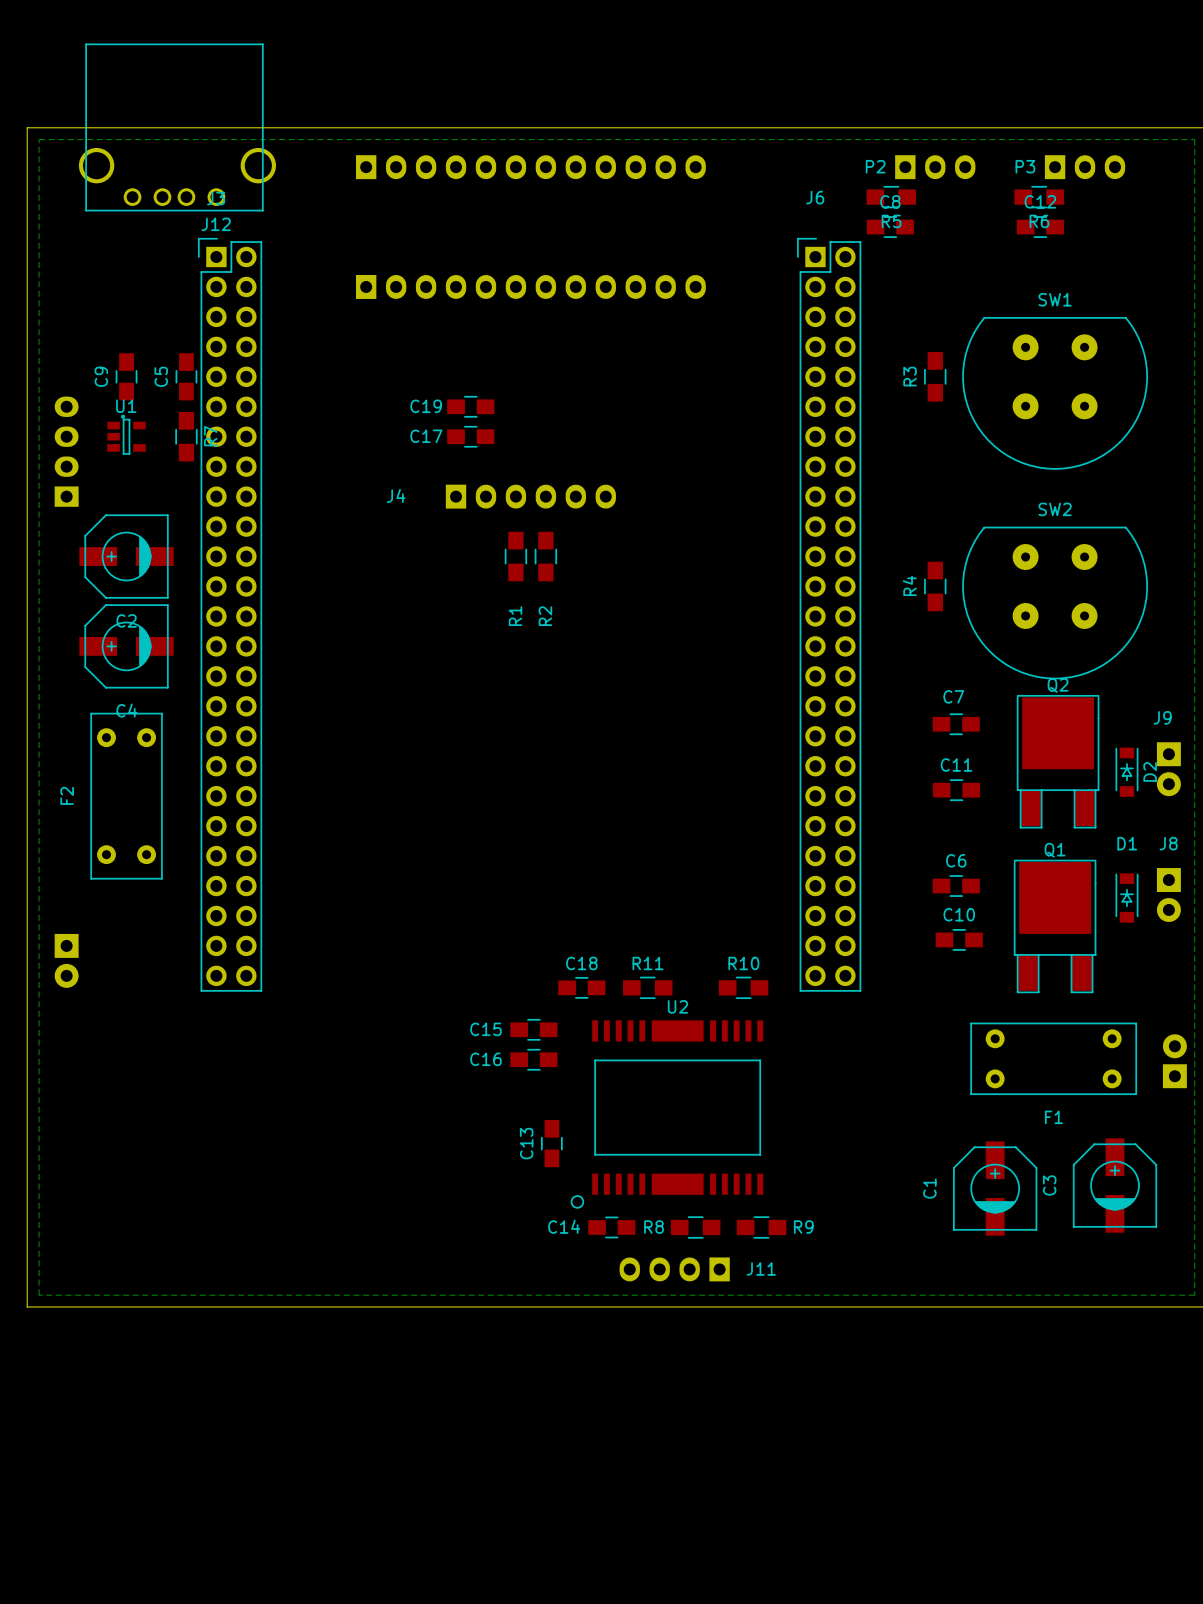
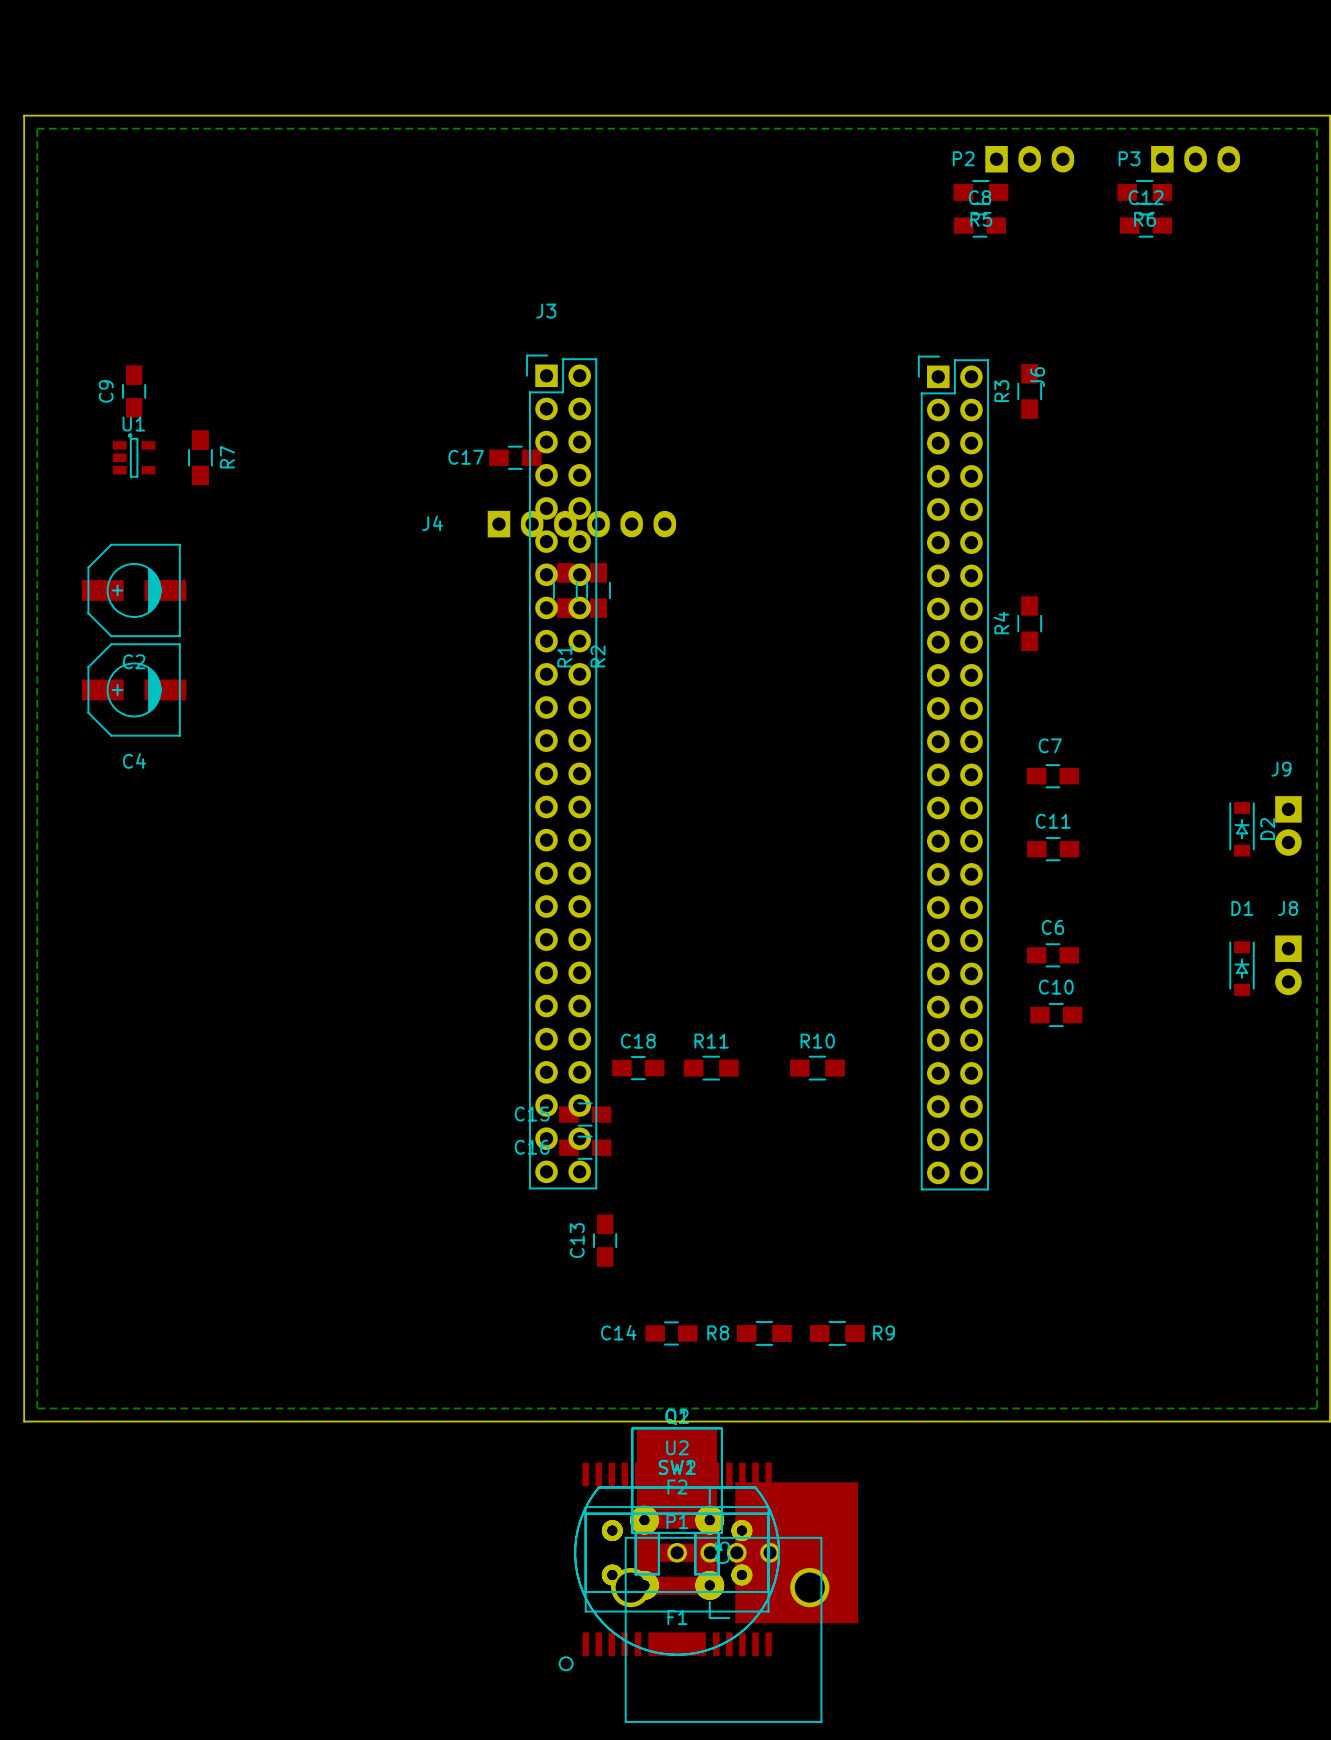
J12: (177, 127) -> none
part: (530, 167) -> none
J6 name rotation: 0° (815, 197) -> 90° counterclockwise (1037, 377)
J6 name position: J6 (815, 197) -> J6 (1037, 377)
part: (530, 286) -> none
C5 footprint: [175, 353, 198, 401] -> [647, 1482, 858, 1624]
SW1 position: (1055, 393) -> (677, 1571)
C19: (470, 406) -> none
part: (66, 451) -> none
SW2 position: (1055, 603) -> (677, 1571)
J3 position: (230, 614) -> (561, 771)
J6 position: (829, 614) -> (953, 773)
Q2 position: (1058, 761) -> (677, 1501)
F2 rotation: 0° (126, 796) -> 90° clockwise (677, 1552)
F2 position: (126, 796) -> (677, 1552)
Q1 position: (1055, 926) -> (677, 1501)
part: (66, 960) -> none
F1 position: (1053, 1058) -> (677, 1552)
part: (1174, 1061) -> none
U2 position: (666, 1114) -> (665, 1566)
C3: (1114, 1185) -> none
C1: (995, 1188) -> none
J11: (674, 1269) -> none
P1: none -> (720, 1629)

